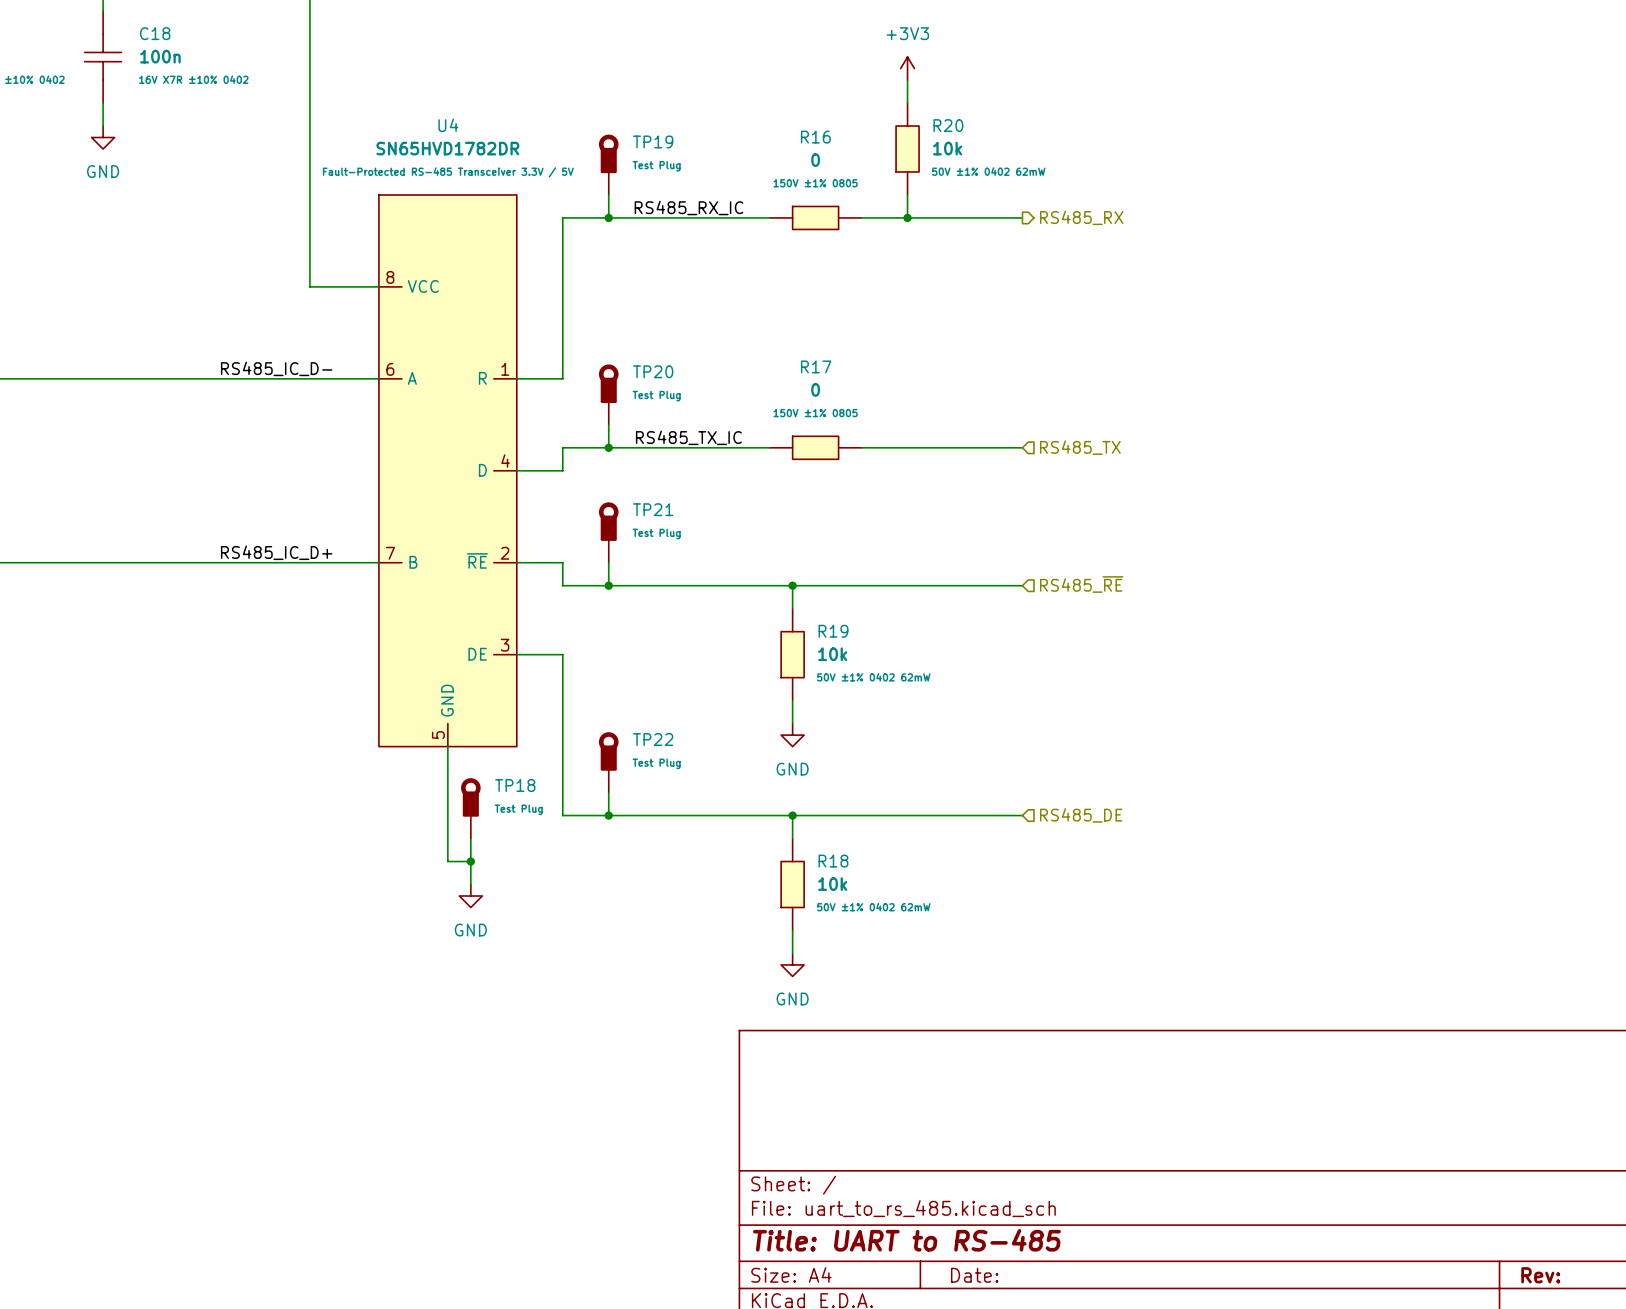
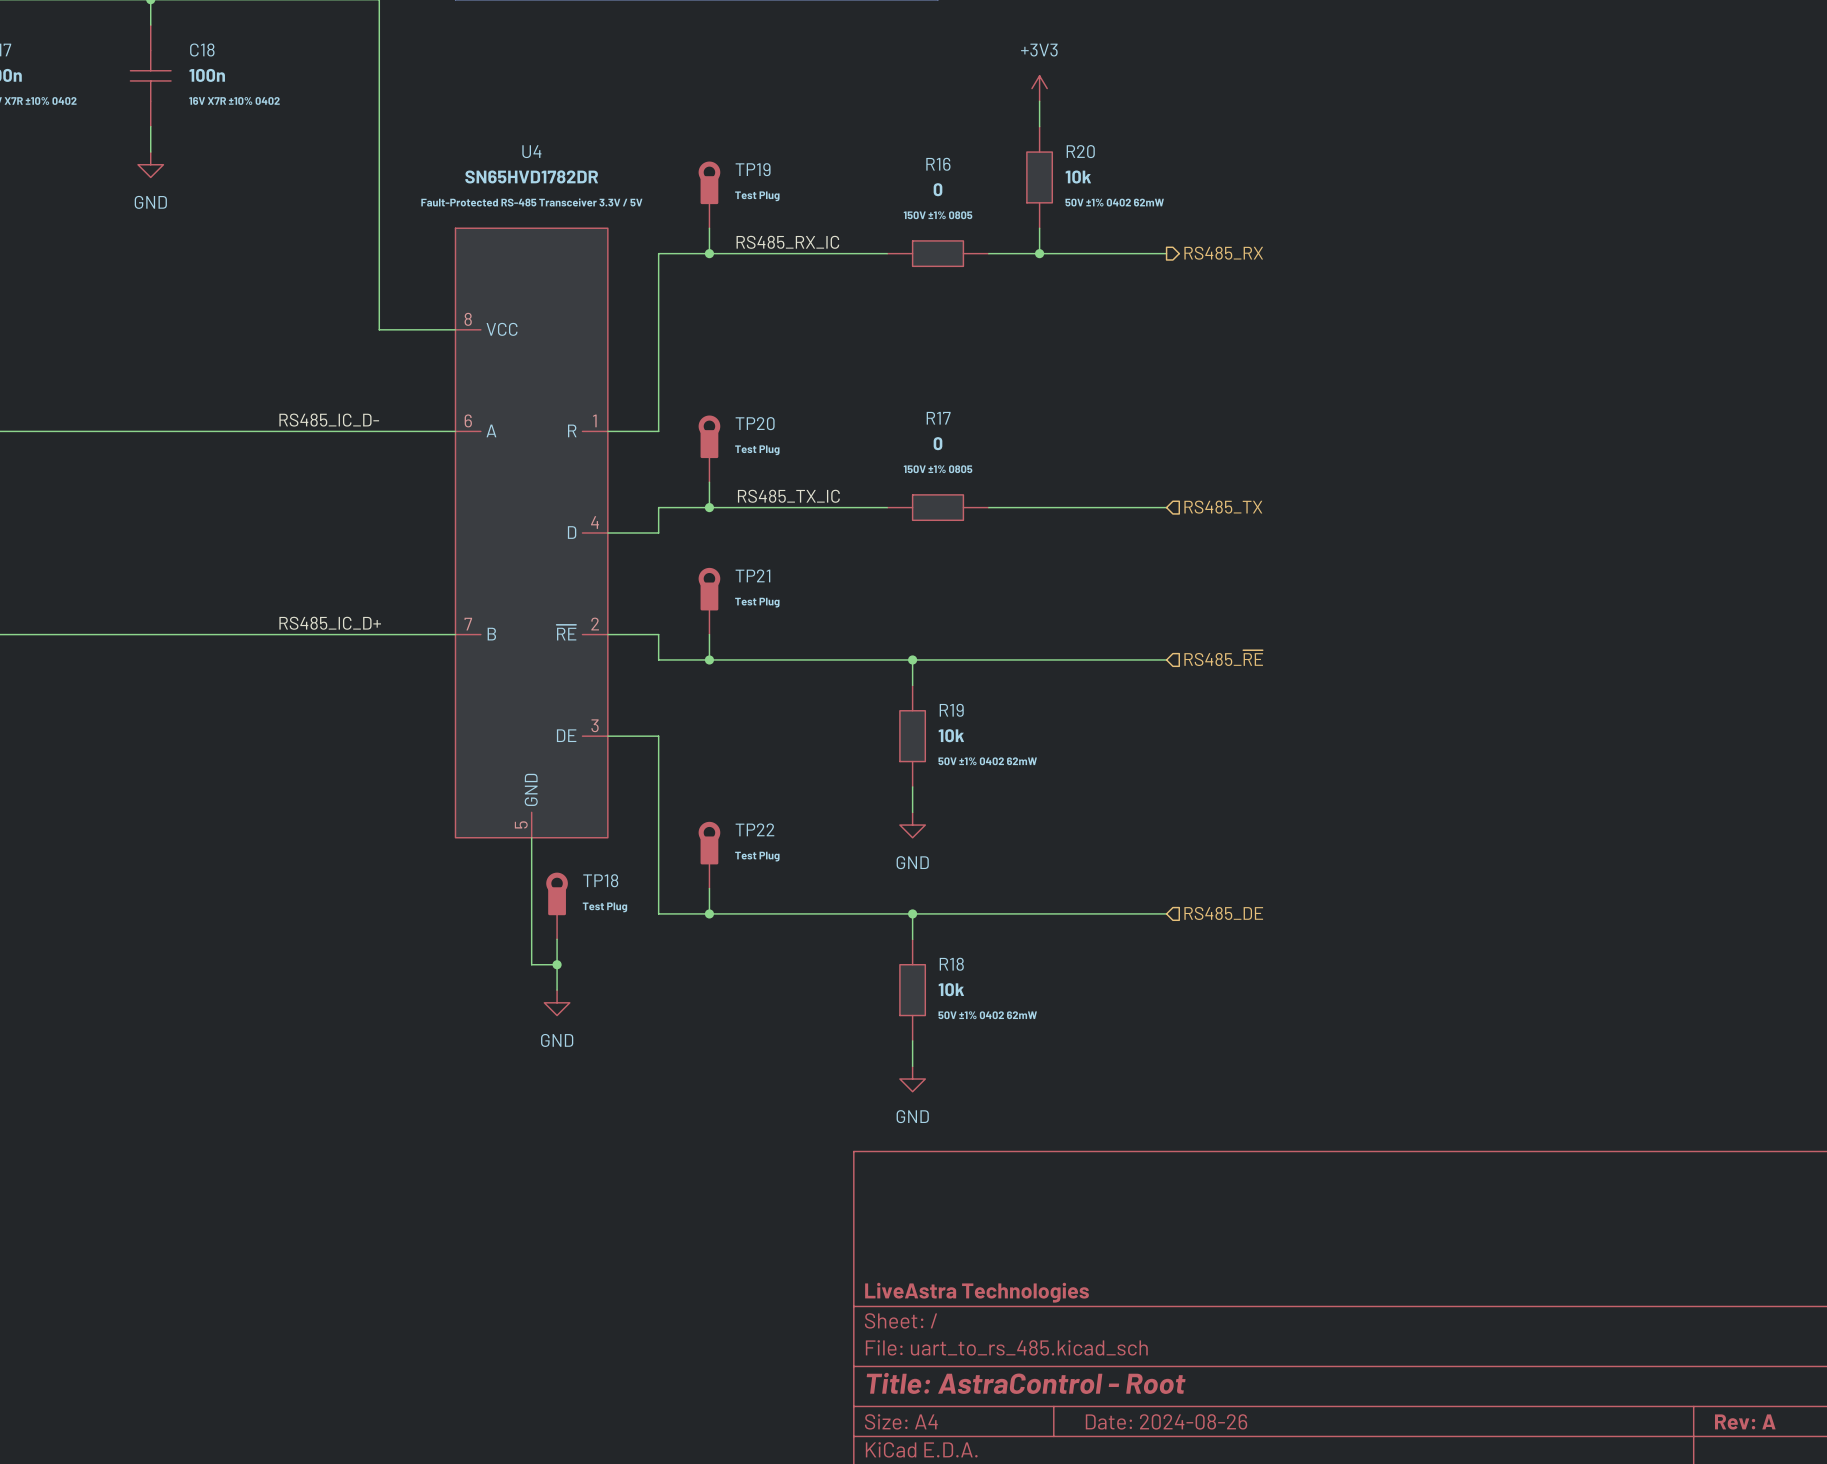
title block: none -> LiveAstra Technologies (977, 1292)
title block: Title: UART to RS-485 (906, 1240) -> Title: AstraControl - Root (1026, 1383)
title block: Date: (974, 1275) -> Date: 2024-08-26 (1166, 1421)
title block: Rev: (1540, 1275) -> Rev: A (1745, 1421)

